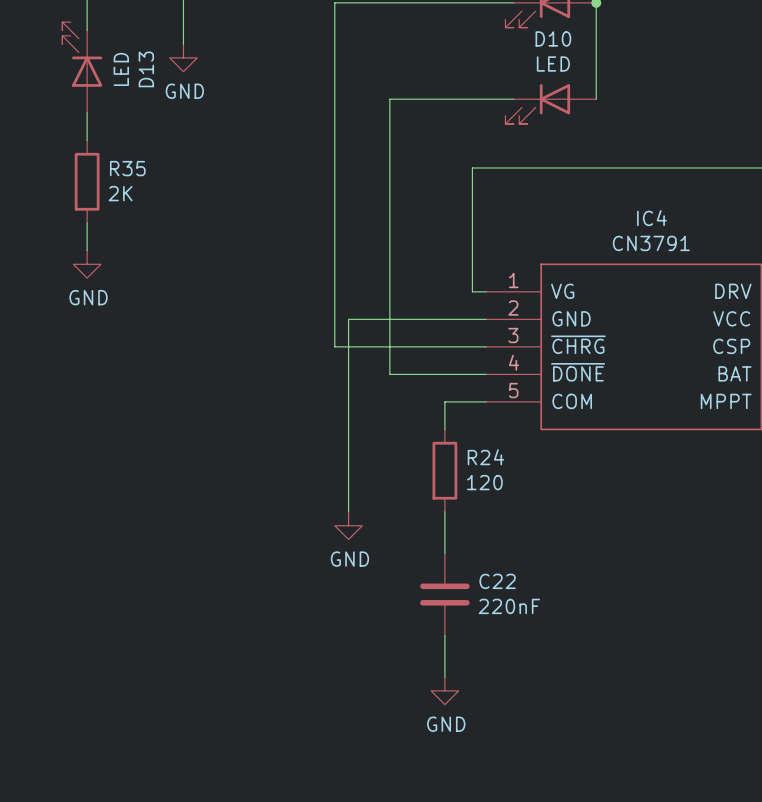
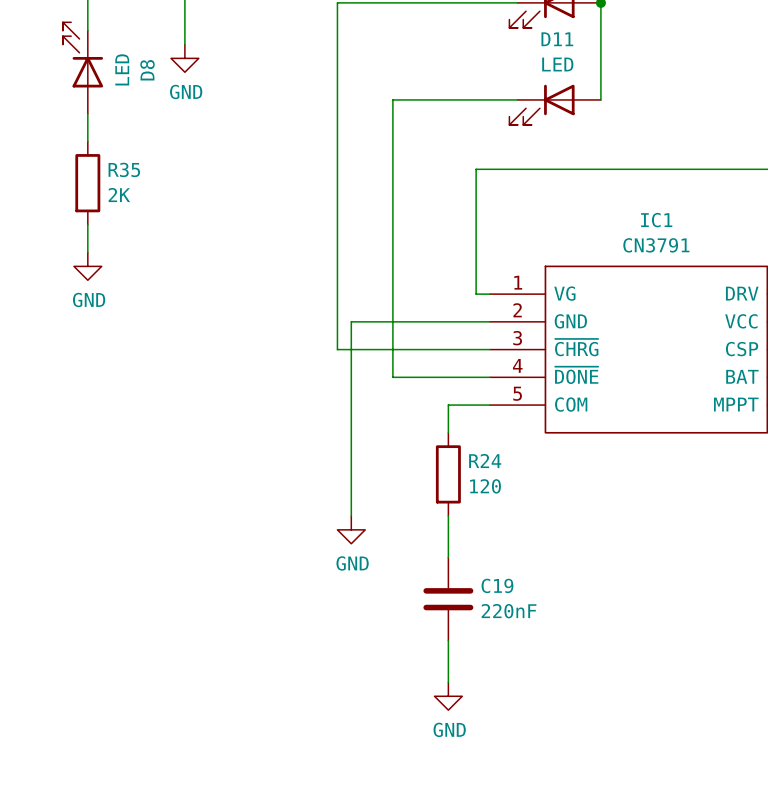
D10 name: D10 (553, 38) -> D11 (557, 39)
D13 name: D13 (146, 69) -> D8 (147, 70)
IC4 name: IC4 (651, 218) -> IC1 (656, 220)
C22 name: C22 (497, 581) -> C19 (497, 585)

